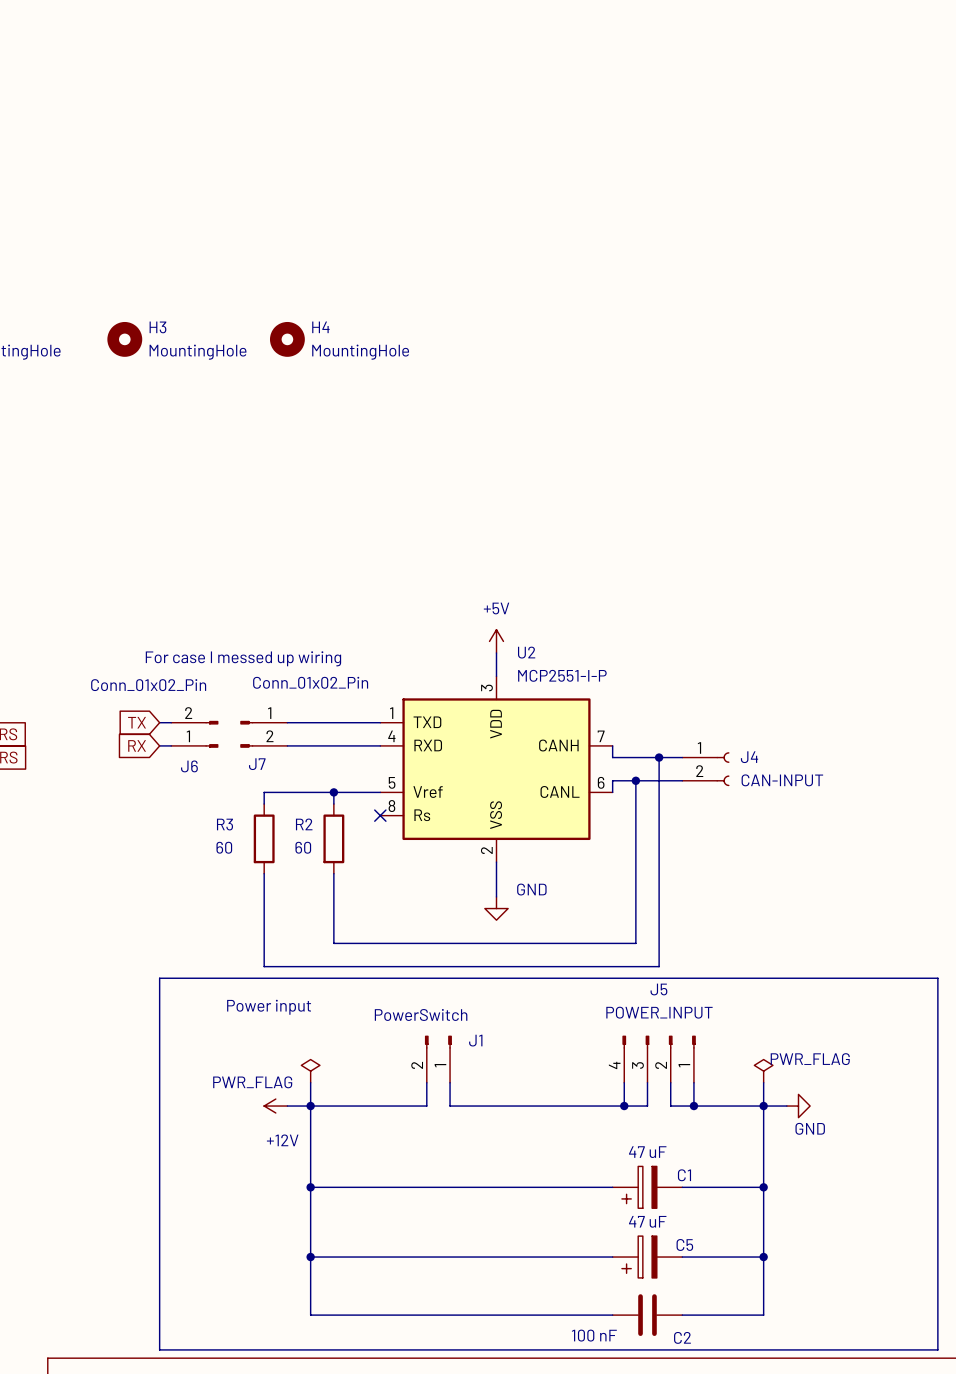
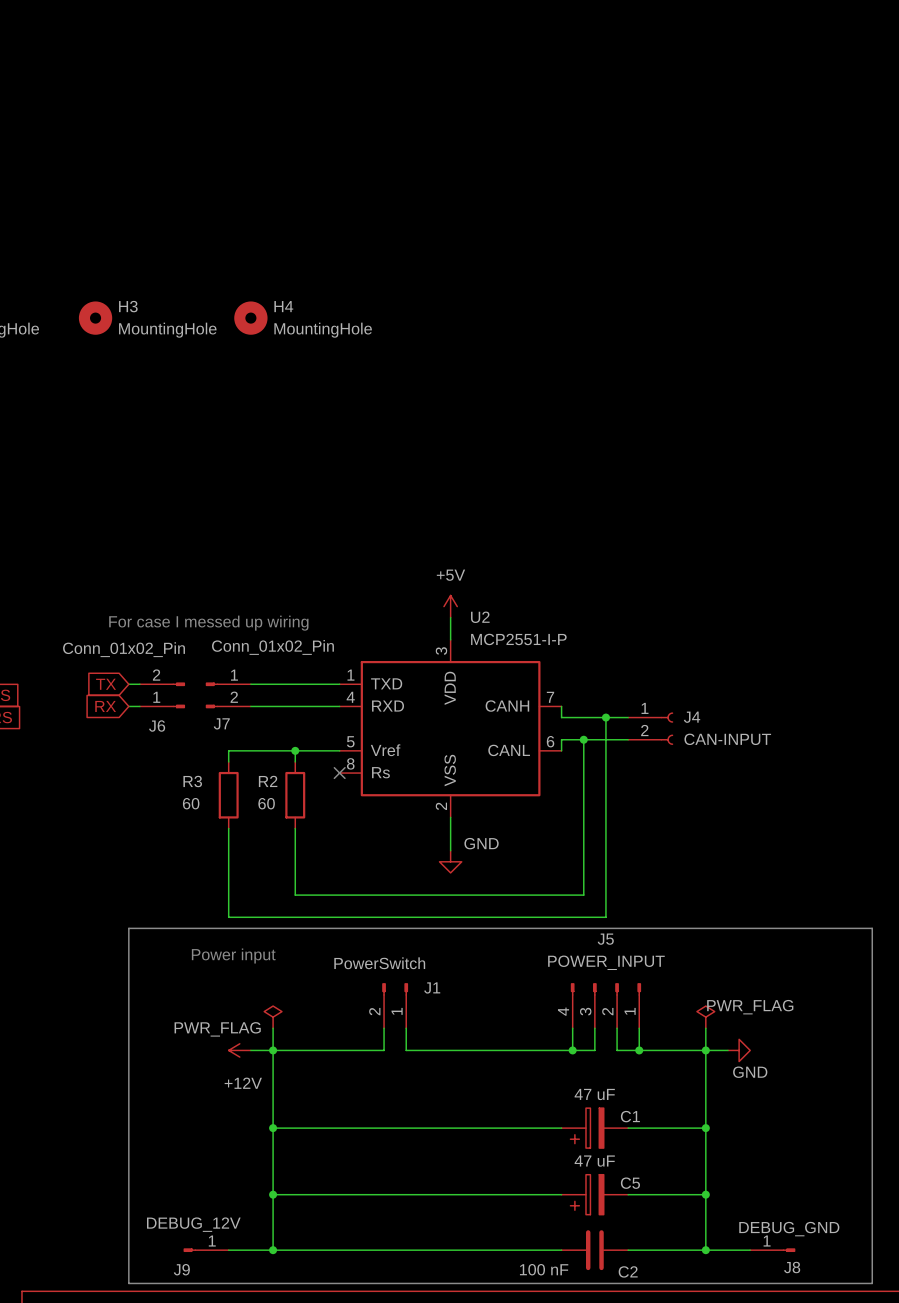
J9: none -> DEBUG_12V (206, 1250)
wire: none -> (228, 1250) (273, 1250)
junction: none -> (273, 1250)
wire: none -> (705, 1250) (750, 1250)
junction: none -> (705, 1250)
J8: none -> DEBUG_GND (772, 1250)

